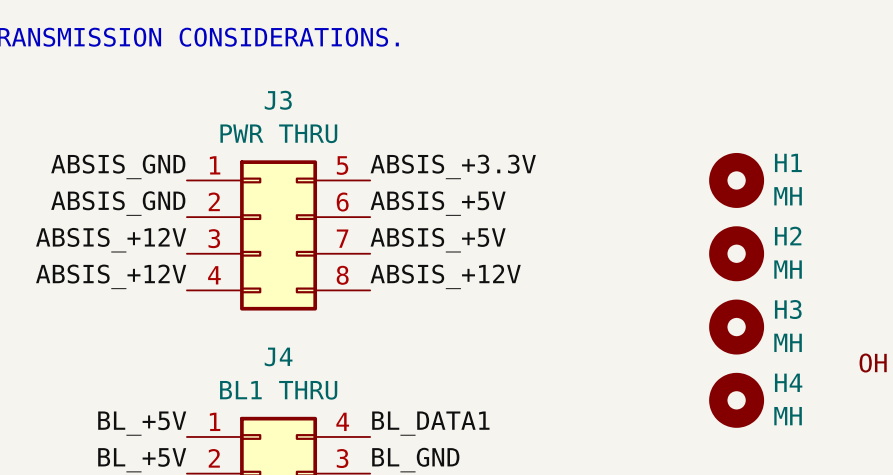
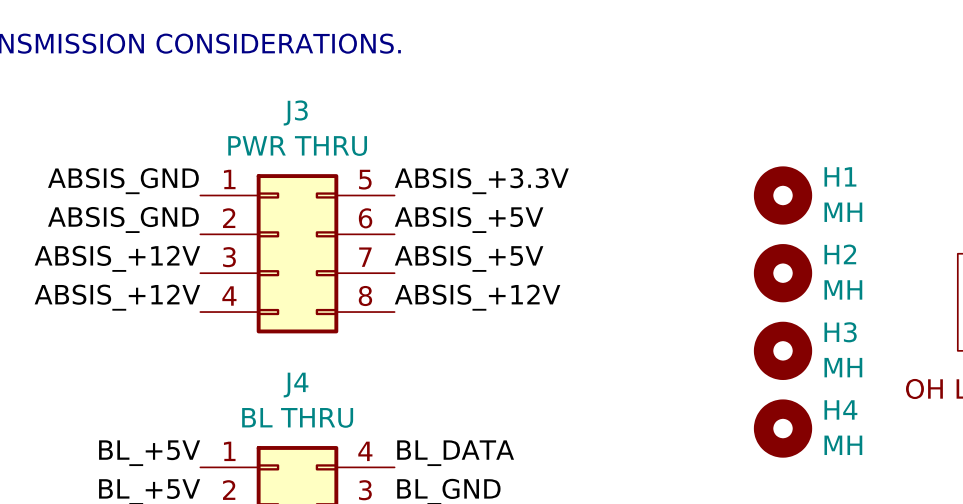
J4 value: BL1 THRU (278, 390) -> BL THRU (297, 417)
label: BL_DATA1 (430, 423) -> BL_DATA (455, 453)

